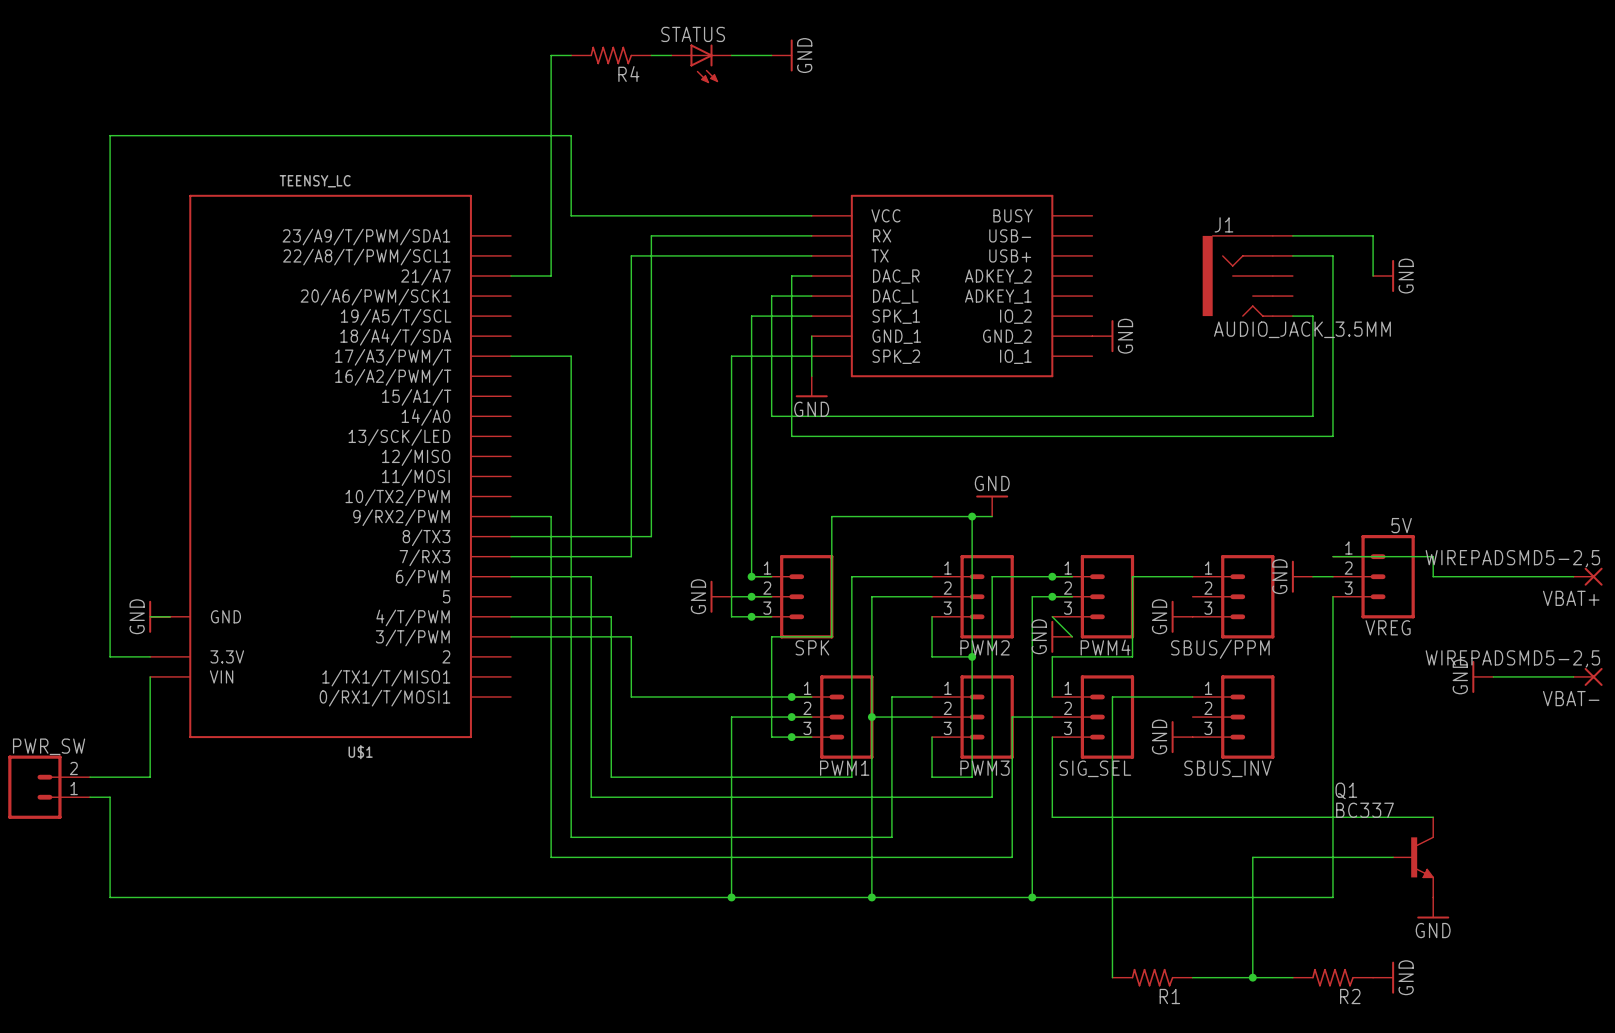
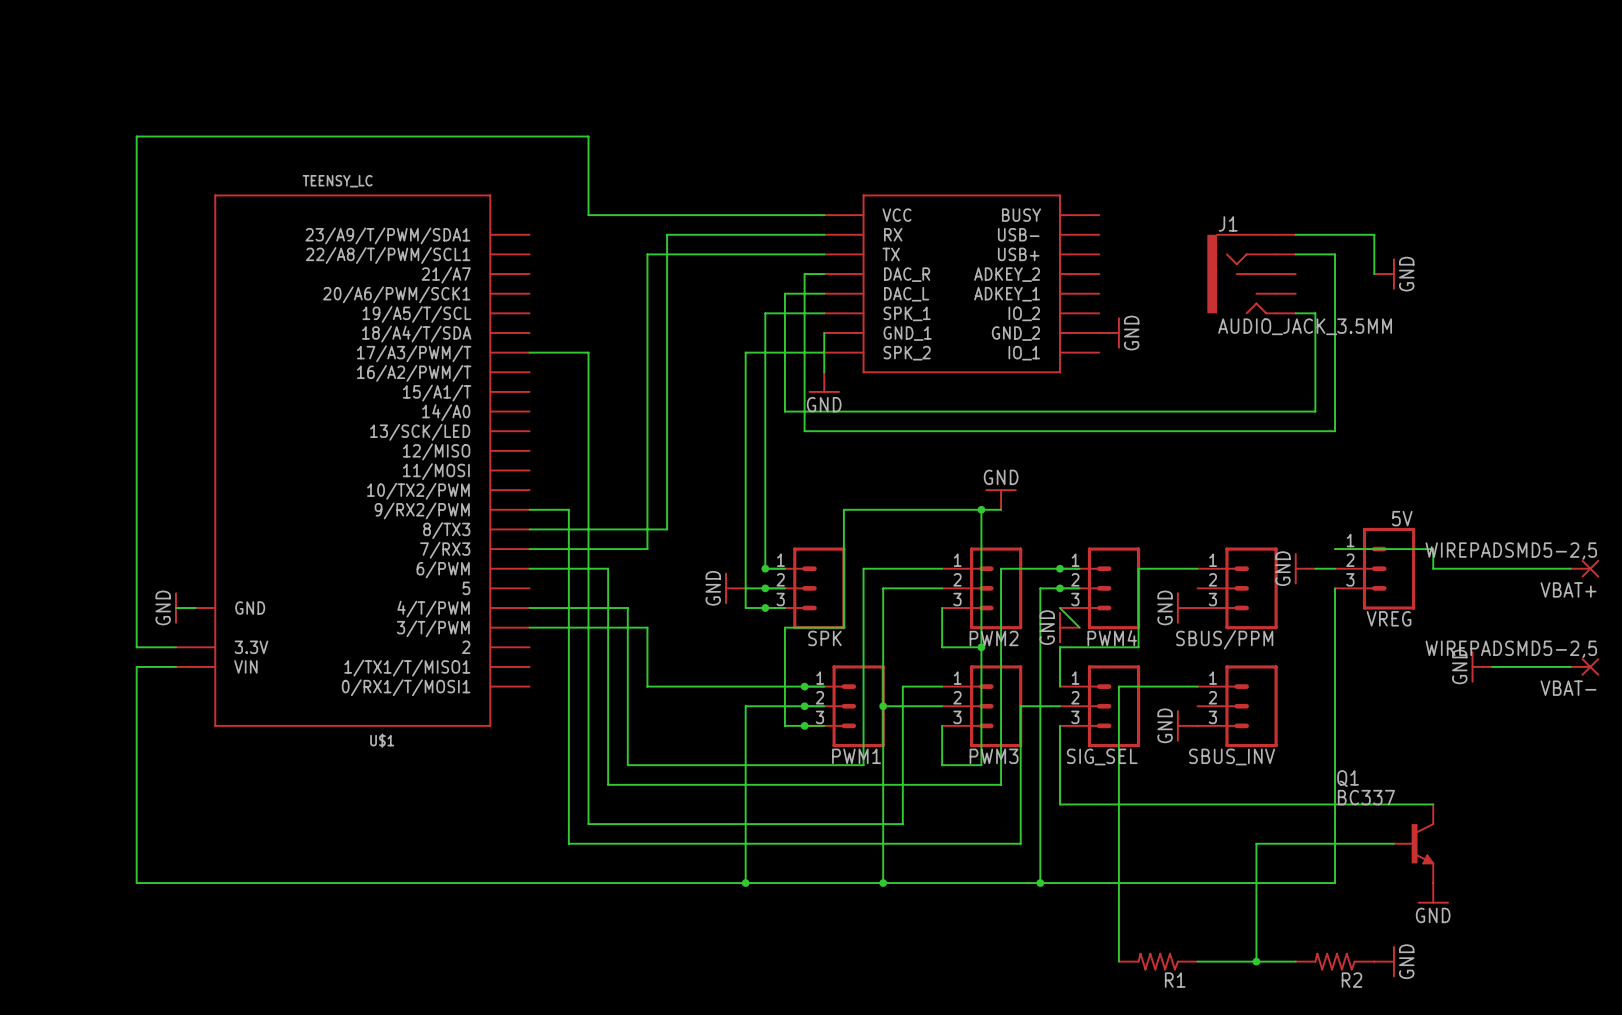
wire: (571, 55) (551, 55) (551, 275) (511, 275) -> none
R4: (611, 55) -> none
wire: (651, 55) (671, 55) -> none
wire: (731, 55) (771, 55) -> none
power symbol: GND (782, 55) -> none
STATUS: (701, 63) -> none
wire: (150, 676) (150, 777) (90, 777) -> (175, 666) (136, 666) (136, 784)
PWR_SW: (49, 787) -> none
wire: (90, 797) (110, 797) -> none

